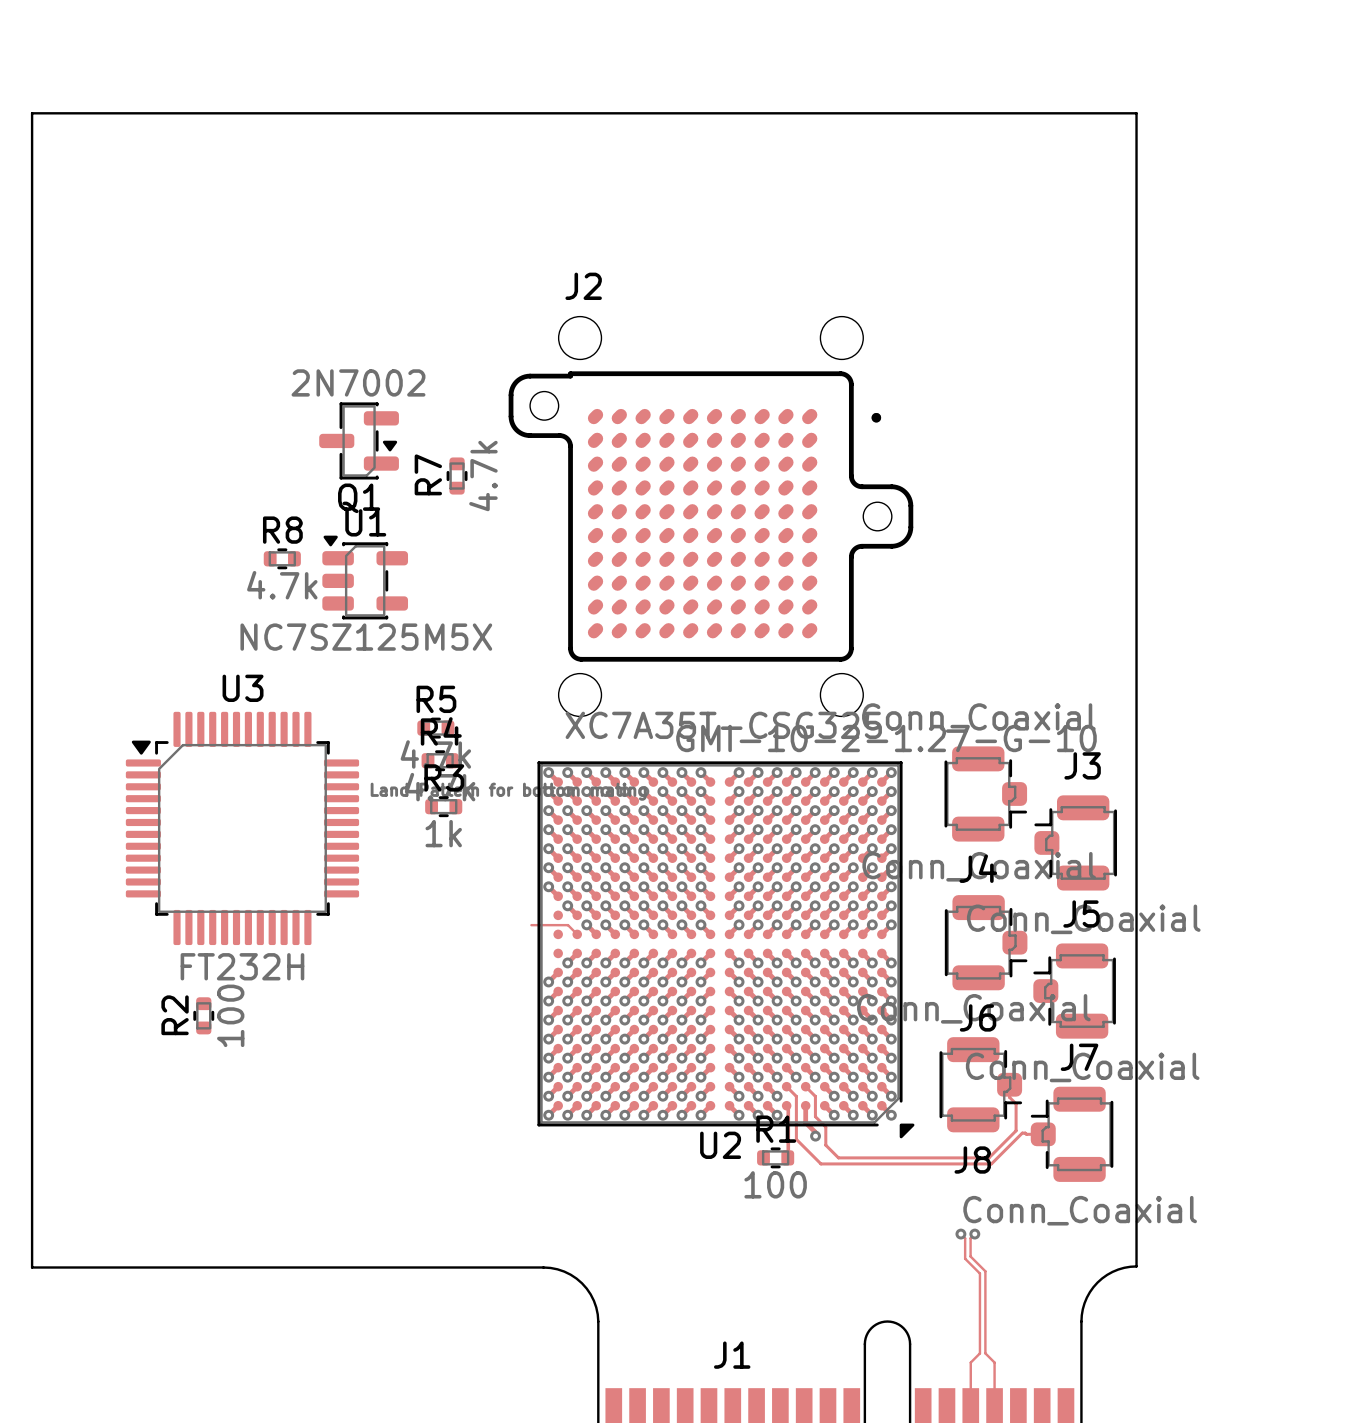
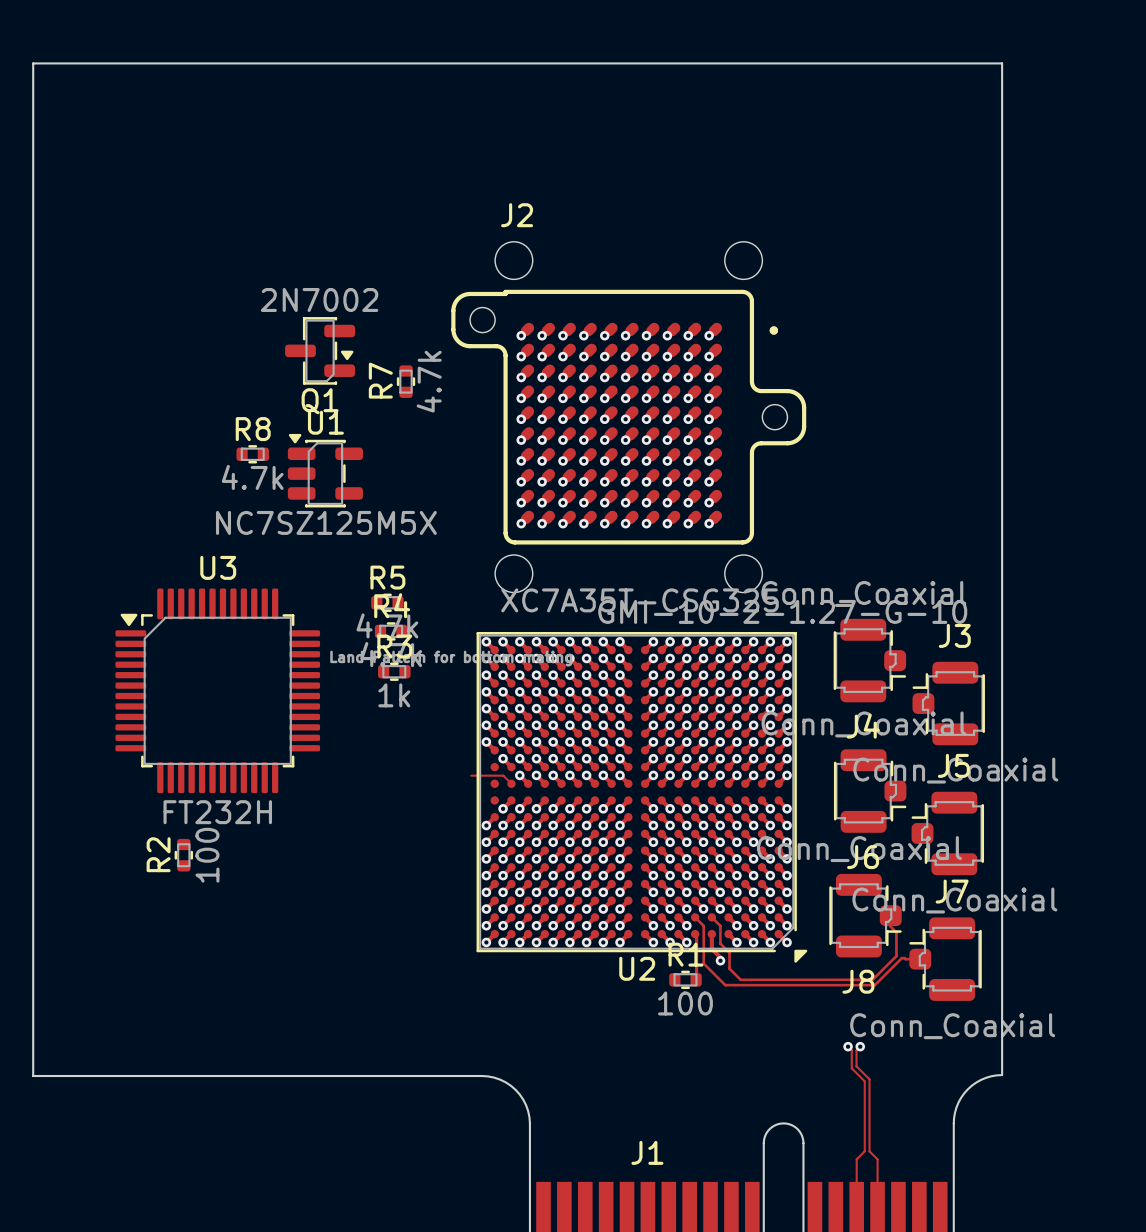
via: none -> (521, 335)
via: none -> (542, 335)
via: none -> (562, 335)
via: none -> (583, 335)
via: none -> (604, 335)
via: none -> (625, 335)
via: none -> (646, 335)
via: none -> (667, 335)
via: none -> (688, 335)
via: none -> (709, 335)
via: none -> (521, 356)
via: none -> (542, 356)
via: none -> (562, 356)
via: none -> (583, 356)
via: none -> (604, 356)
via: none -> (625, 356)
via: none -> (646, 356)
via: none -> (667, 356)
via: none -> (688, 356)
via: none -> (709, 356)
via: none -> (521, 377)
via: none -> (542, 377)
via: none -> (562, 377)
via: none -> (583, 377)
via: none -> (604, 377)
via: none -> (625, 377)
via: none -> (646, 377)
via: none -> (667, 377)
via: none -> (688, 377)
via: none -> (709, 377)
via: none -> (521, 398)
via: none -> (542, 398)
via: none -> (562, 398)
via: none -> (583, 398)
via: none -> (604, 398)
via: none -> (625, 398)
via: none -> (646, 398)
via: none -> (667, 398)
via: none -> (688, 398)
via: none -> (709, 398)
via: none -> (521, 419)
via: none -> (542, 419)
via: none -> (562, 419)
via: none -> (583, 419)
via: none -> (604, 419)
via: none -> (625, 419)
via: none -> (646, 419)
via: none -> (667, 419)
via: none -> (688, 419)
via: none -> (709, 419)
via: none -> (521, 440)
via: none -> (542, 440)
via: none -> (562, 440)
via: none -> (583, 440)
via: none -> (604, 440)
via: none -> (625, 440)
via: none -> (646, 440)
via: none -> (667, 440)
via: none -> (688, 440)
via: none -> (709, 440)
via: none -> (521, 461)
via: none -> (542, 461)
via: none -> (562, 461)
via: none -> (583, 461)
via: none -> (604, 461)
via: none -> (625, 461)
via: none -> (646, 461)
via: none -> (667, 461)
via: none -> (688, 461)
via: none -> (709, 461)
via: none -> (521, 481)
via: none -> (542, 481)
via: none -> (562, 481)
via: none -> (583, 481)
via: none -> (604, 481)
via: none -> (625, 481)
via: none -> (646, 481)
via: none -> (667, 481)
via: none -> (688, 481)
via: none -> (709, 481)
via: none -> (521, 502)
via: none -> (542, 502)
via: none -> (562, 502)
via: none -> (583, 502)
via: none -> (604, 502)
via: none -> (625, 502)
via: none -> (646, 502)
via: none -> (667, 502)
via: none -> (688, 502)
via: none -> (709, 502)
via: none -> (521, 523)
via: none -> (542, 523)
via: none -> (562, 523)
via: none -> (583, 523)
via: none -> (604, 523)
via: none -> (625, 523)
via: none -> (646, 523)
via: none -> (667, 523)
via: none -> (688, 523)
via: none -> (709, 523)

